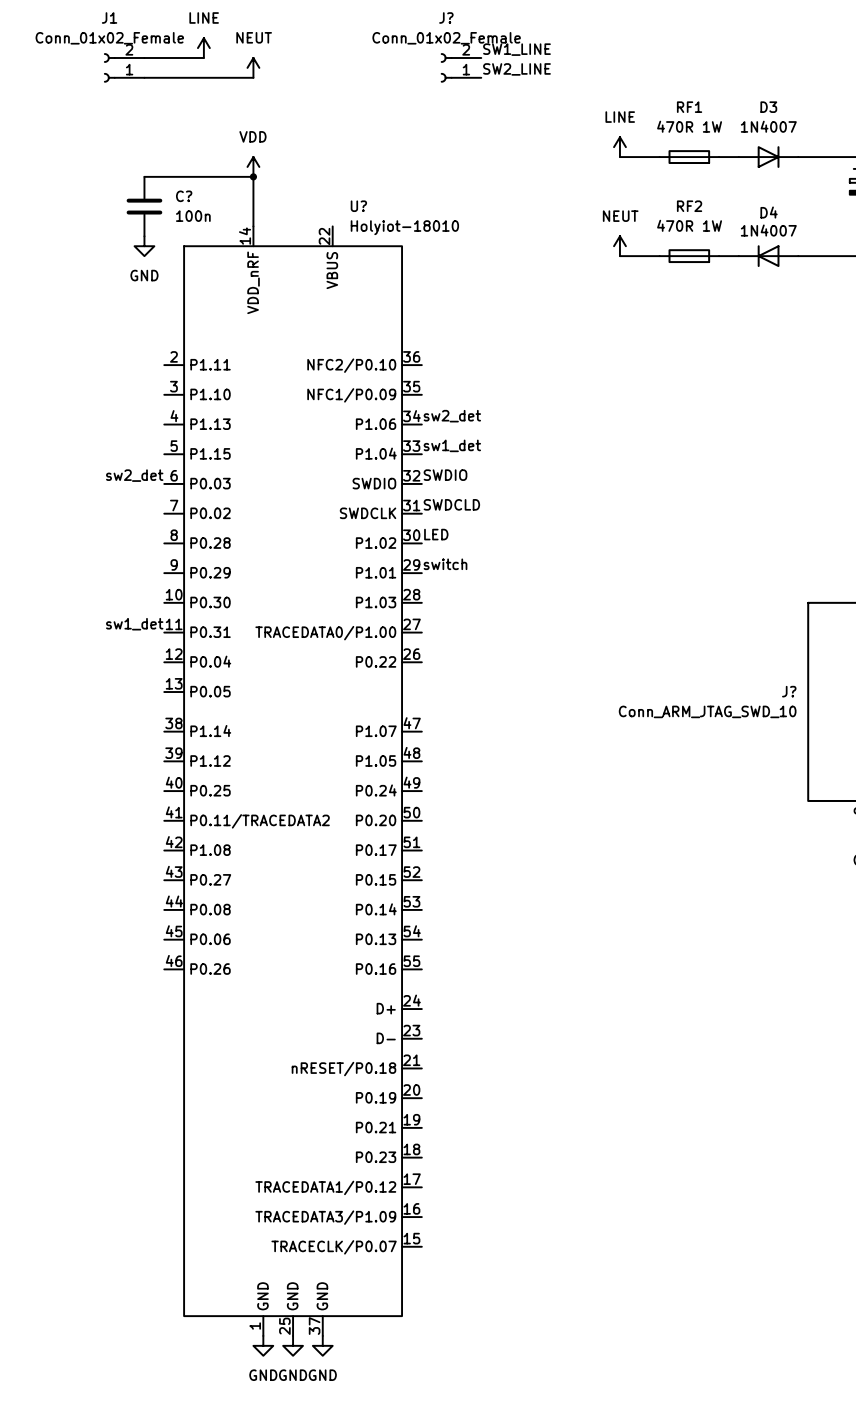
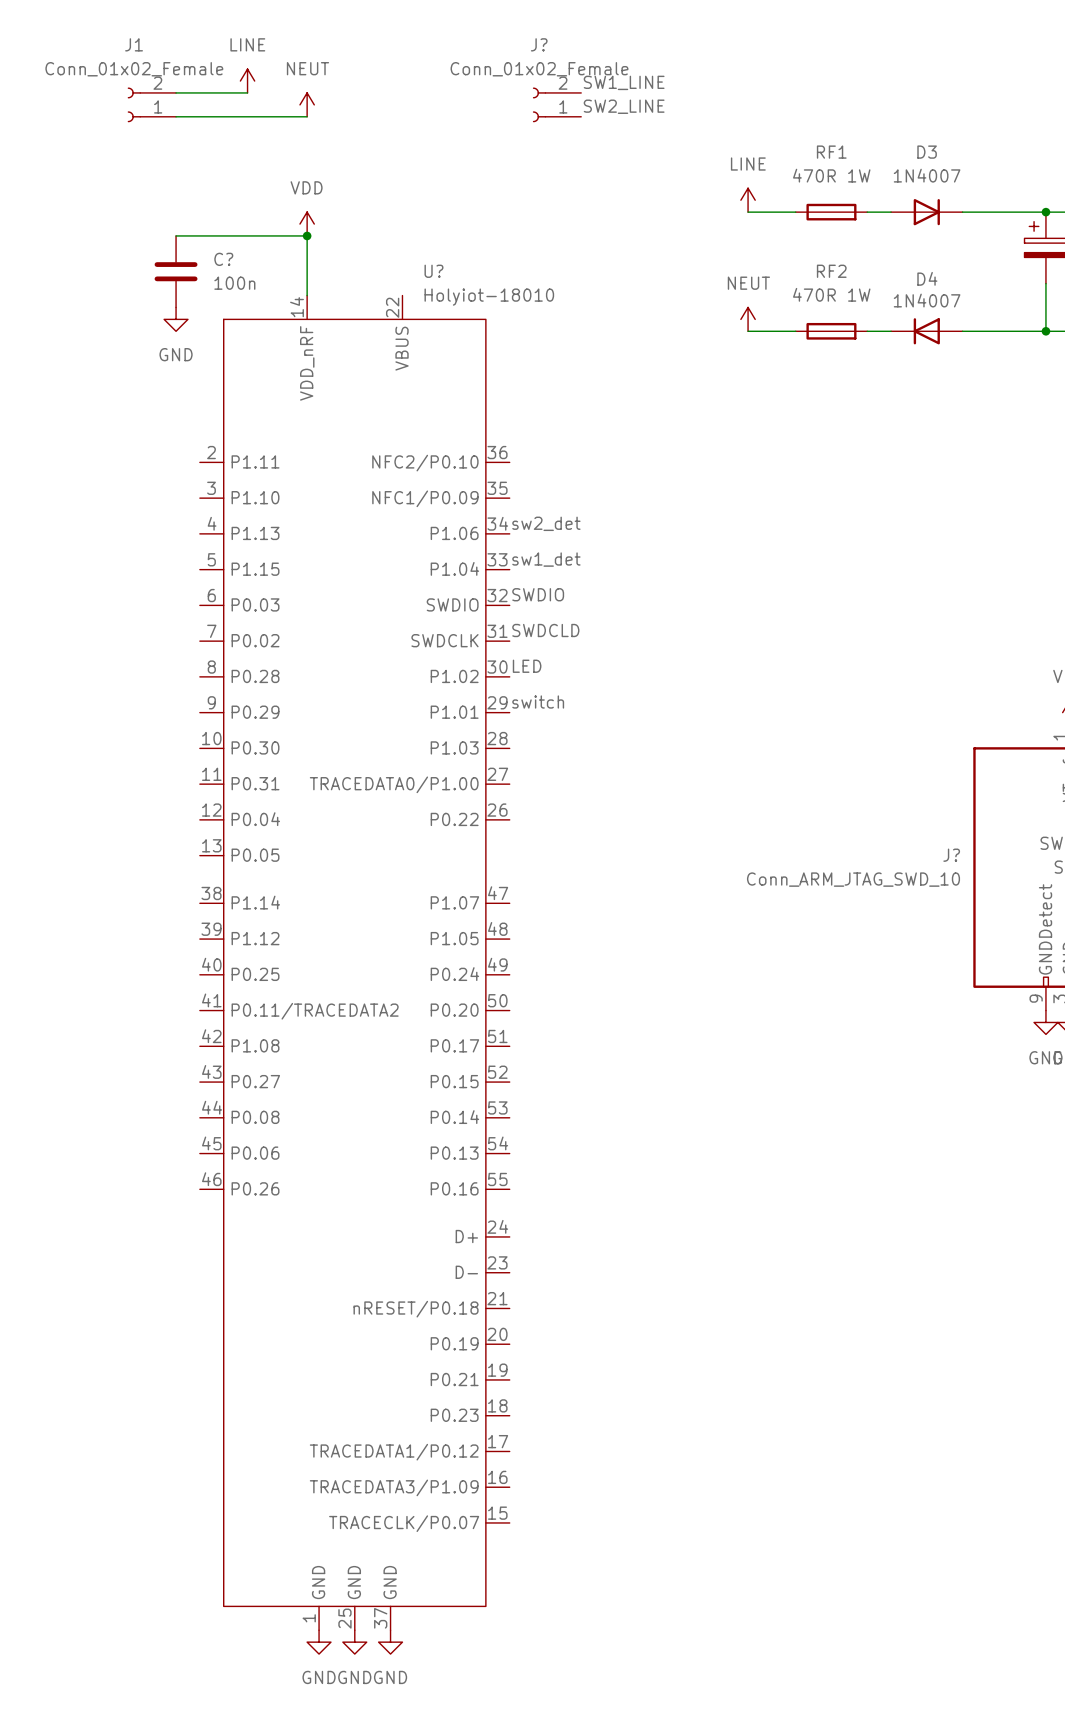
label: sw2_det (134, 475) -> none
label: sw1_det (134, 624) -> none

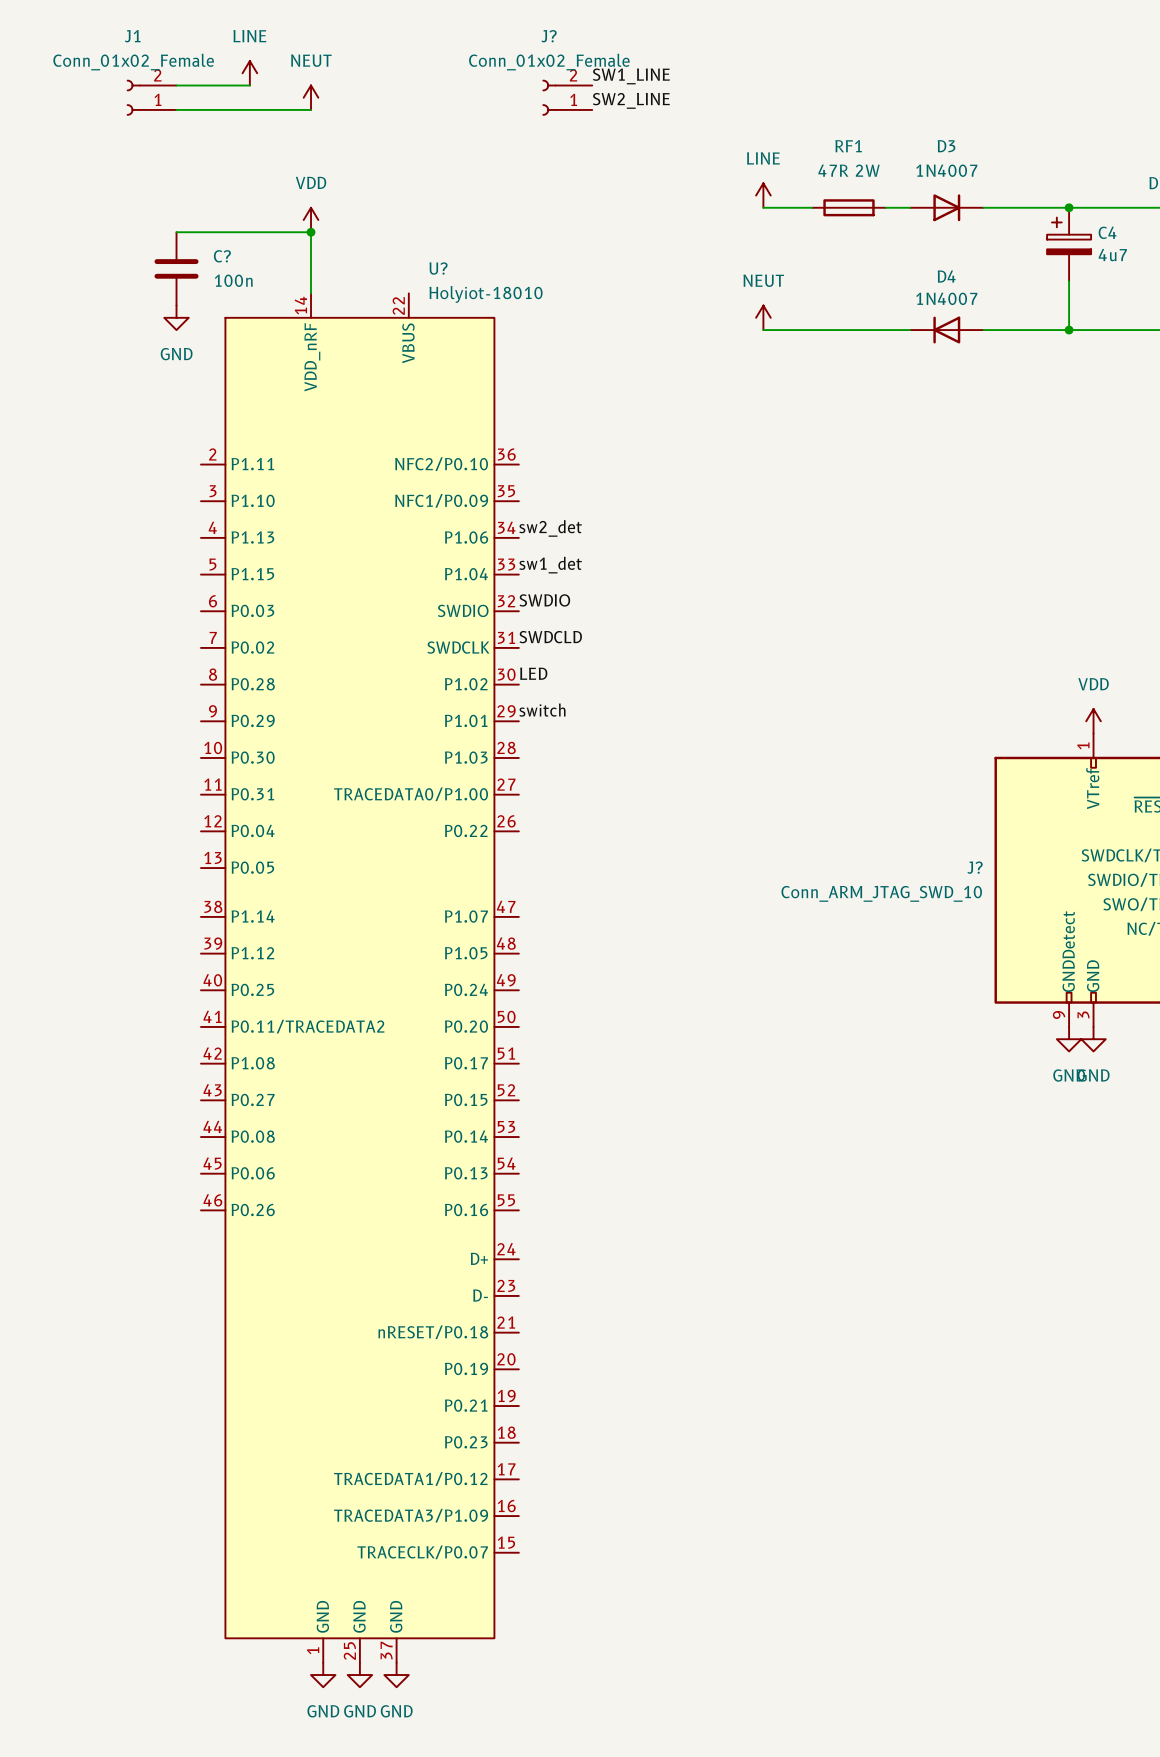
RF1 value: 470R 1W (831, 175) -> 47R 2W (849, 170)
RF2: 470R 1W (831, 331) -> none

